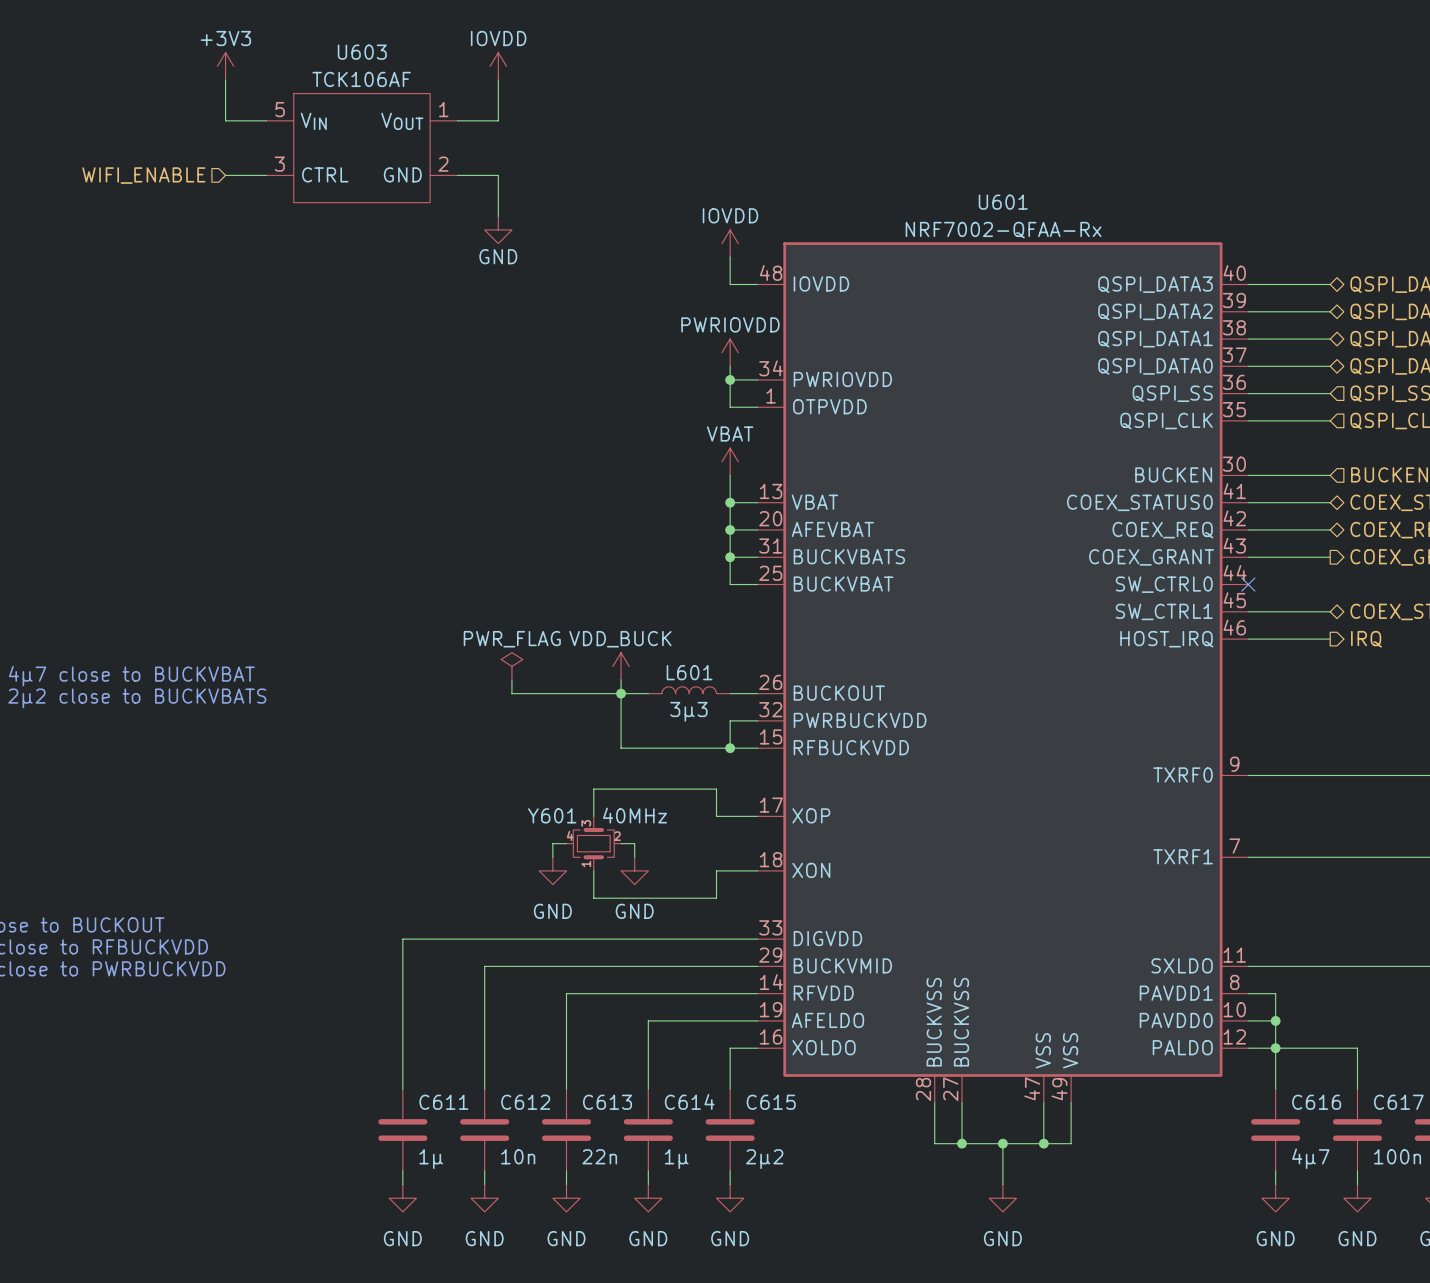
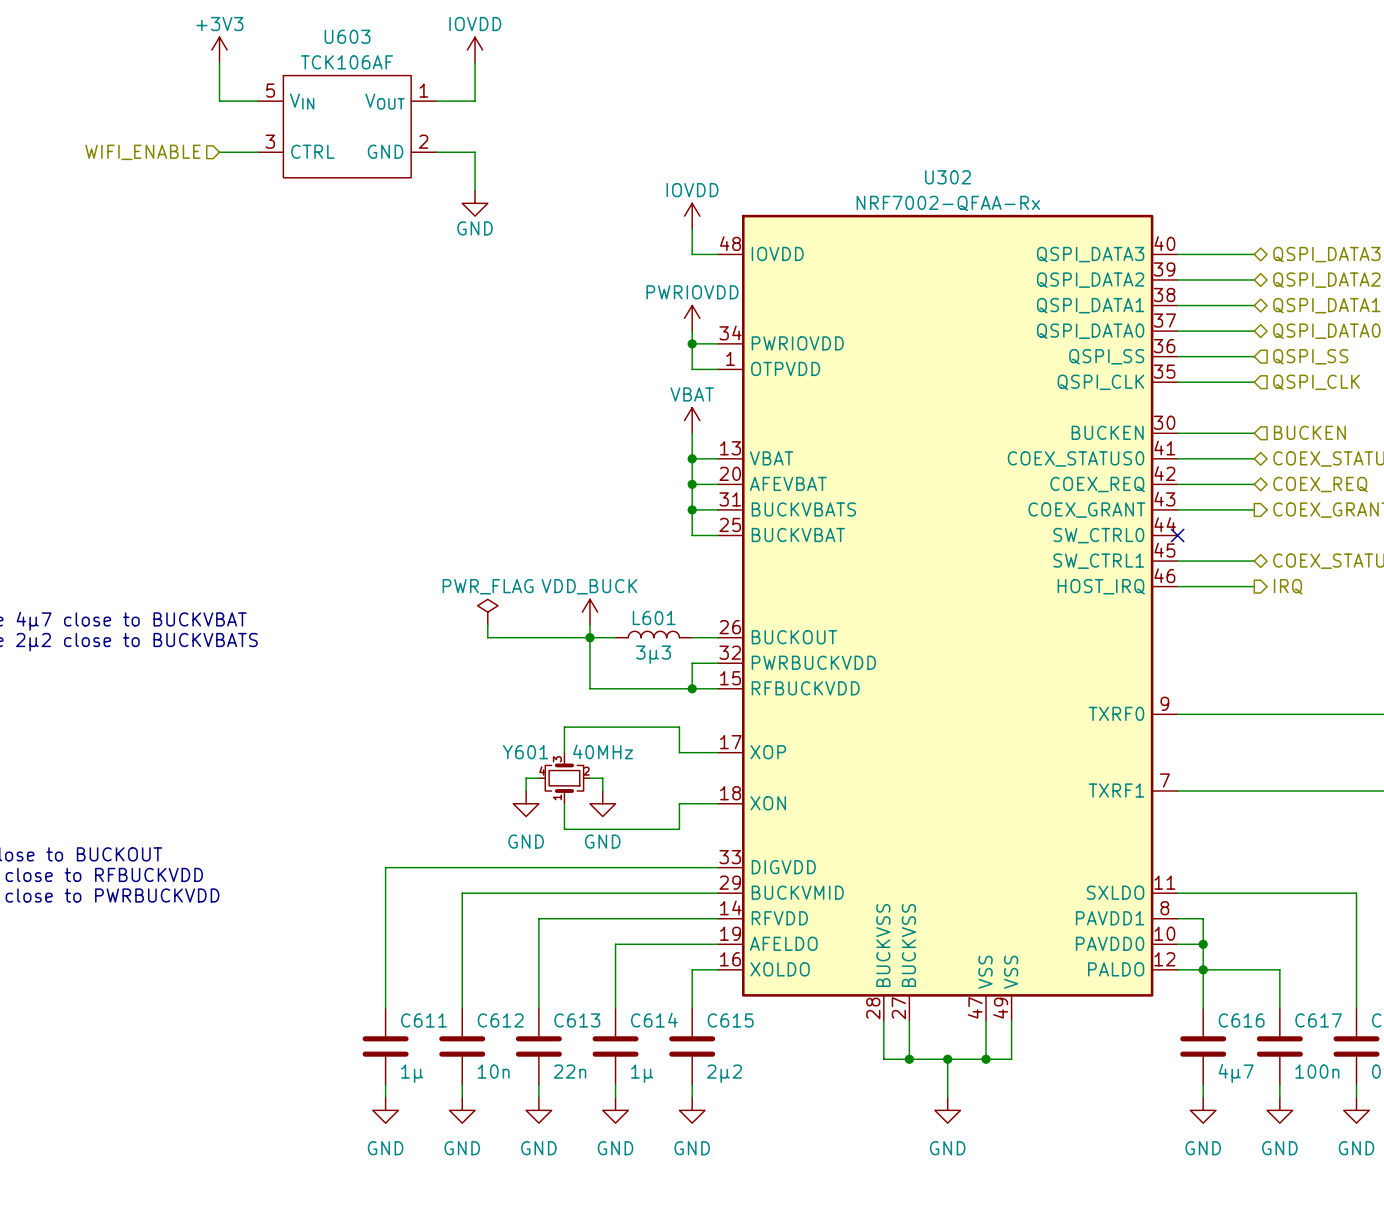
U601 name: U601 (1003, 202) -> U302 (948, 177)

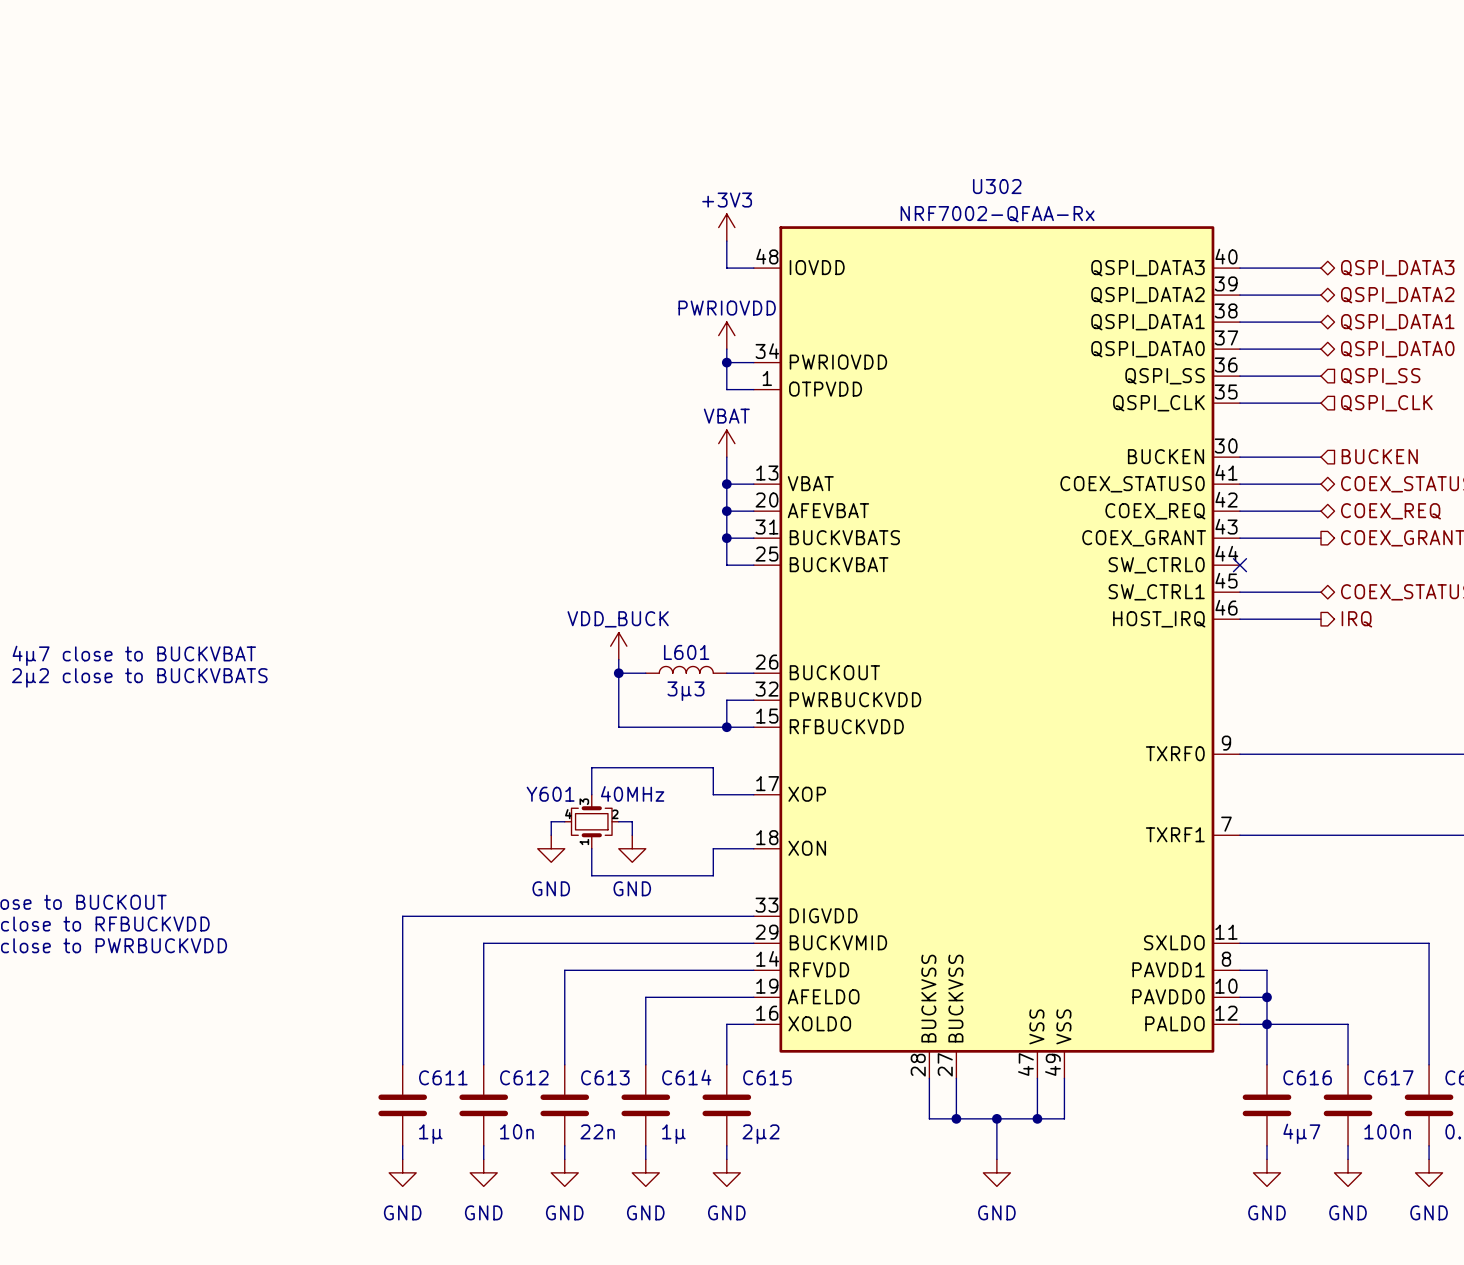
power symbol: +3V3 (219, 50) -> none
power symbol: IOVDD (475, 50) -> none
wire: (219, 62) (219, 101) (257, 101) -> none
wire: (475, 62) (475, 101) (436, 101) -> none
U603: TCK106AF (347, 126) -> none
hierarchical label: WIFI_ENABLE (142, 152) -> none
wire: (219, 152) (257, 152) -> none
wire: (436, 152) (475, 152) (475, 190) -> none
power symbol: GND (475, 203) -> none
power symbol: IOVDD (692, 216) -> +3V3 (726, 227)
power symbol: PWR_FLAG (487, 612) -> none
wire: (487, 624) (487, 637) (589, 637) -> none

